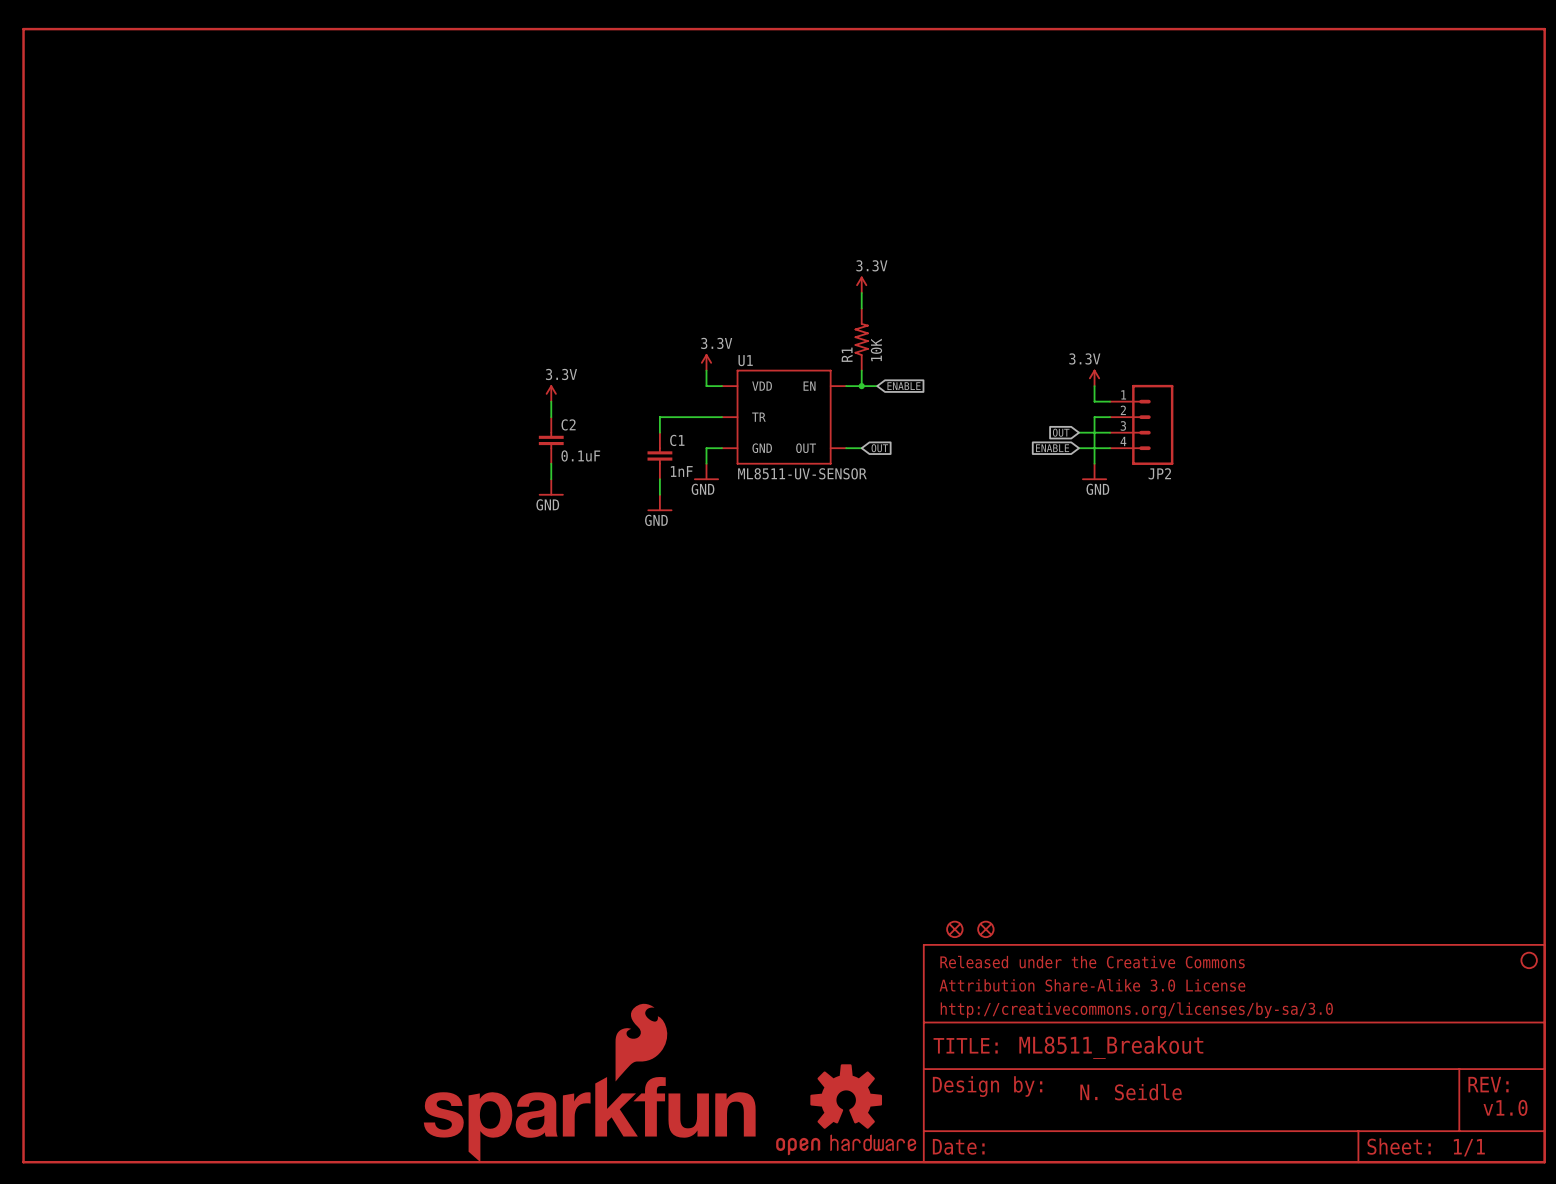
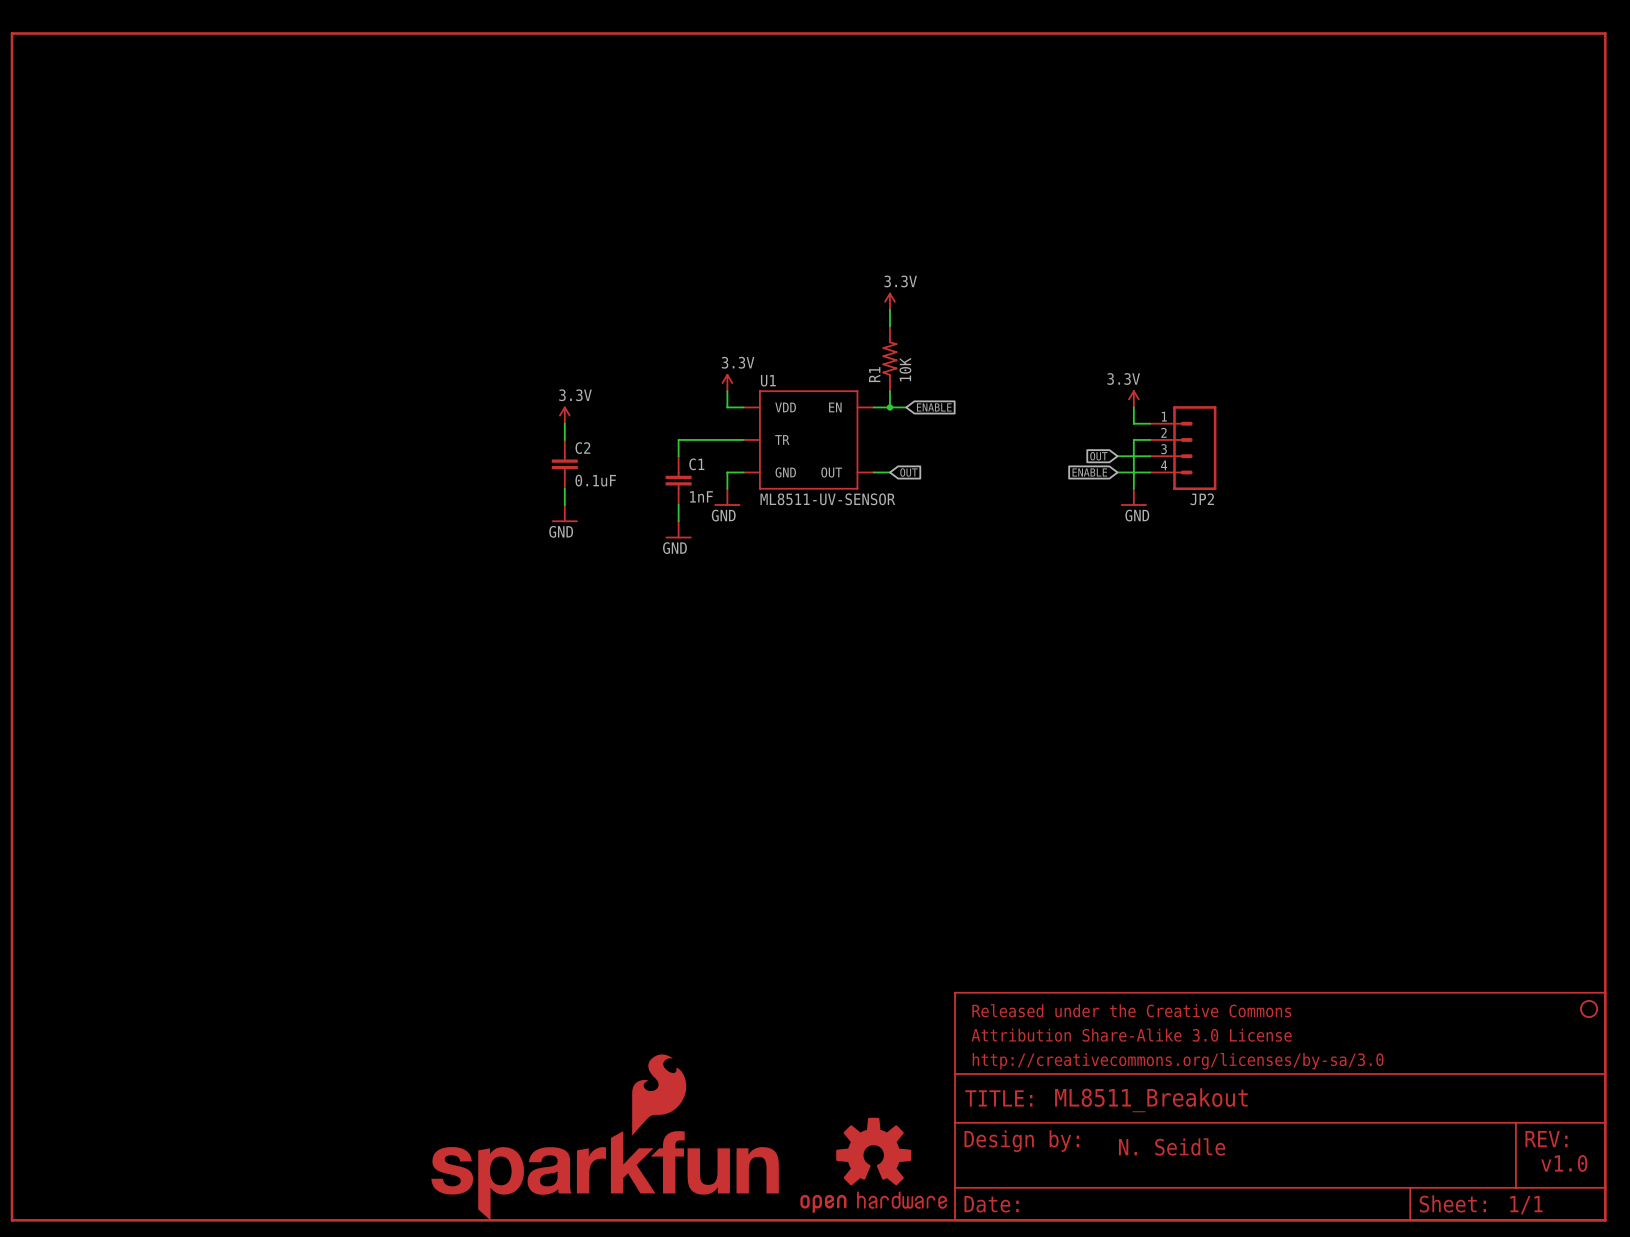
part: (954, 929) -> none
part: (985, 929) -> none

